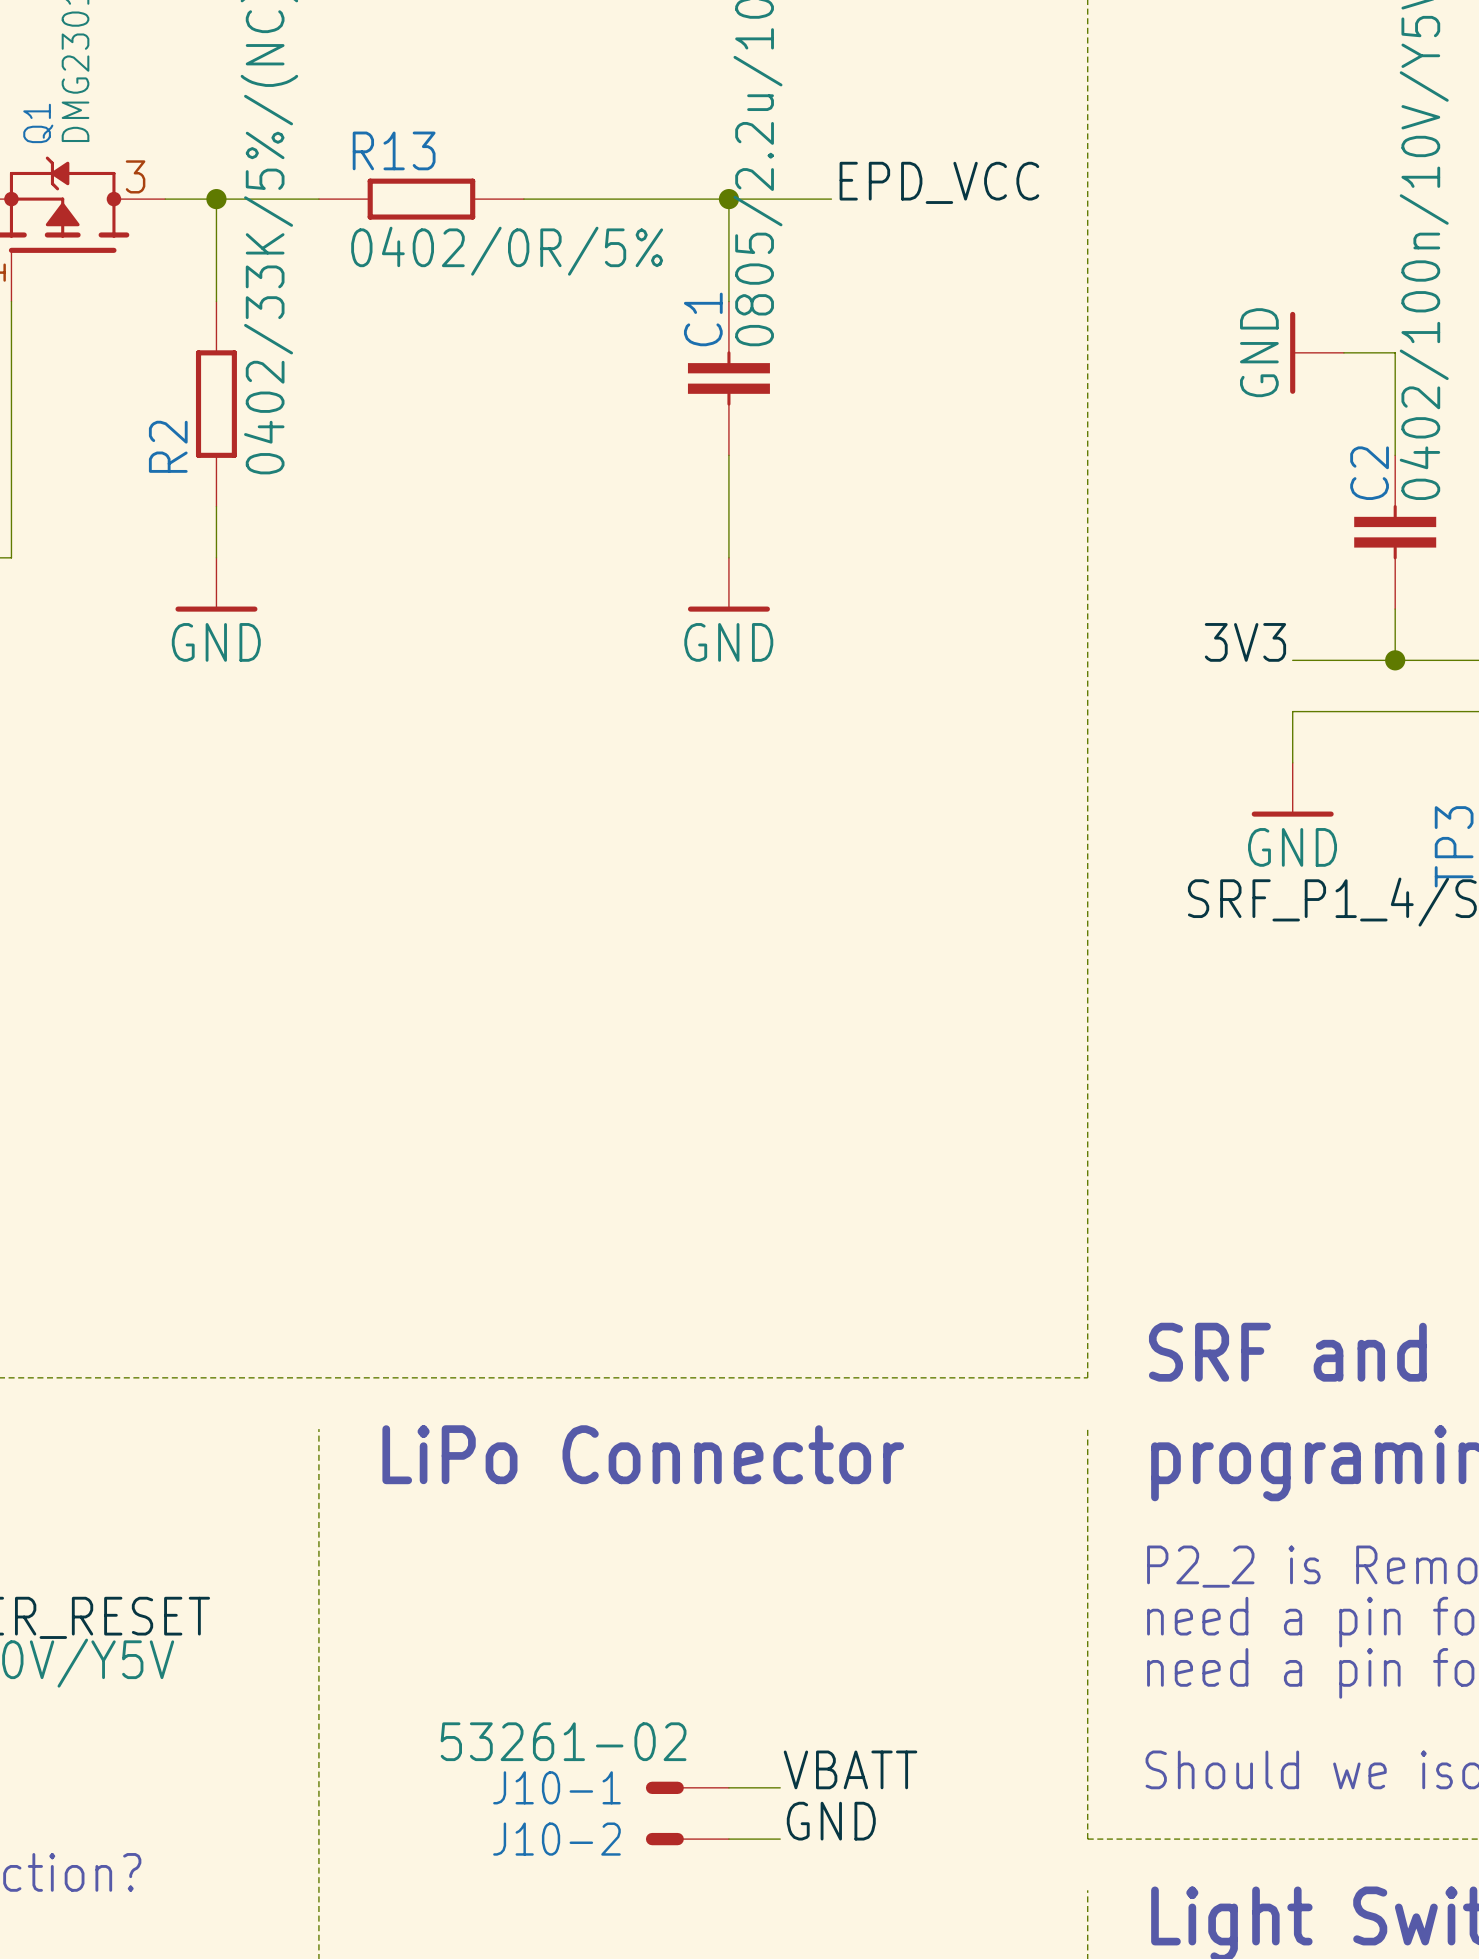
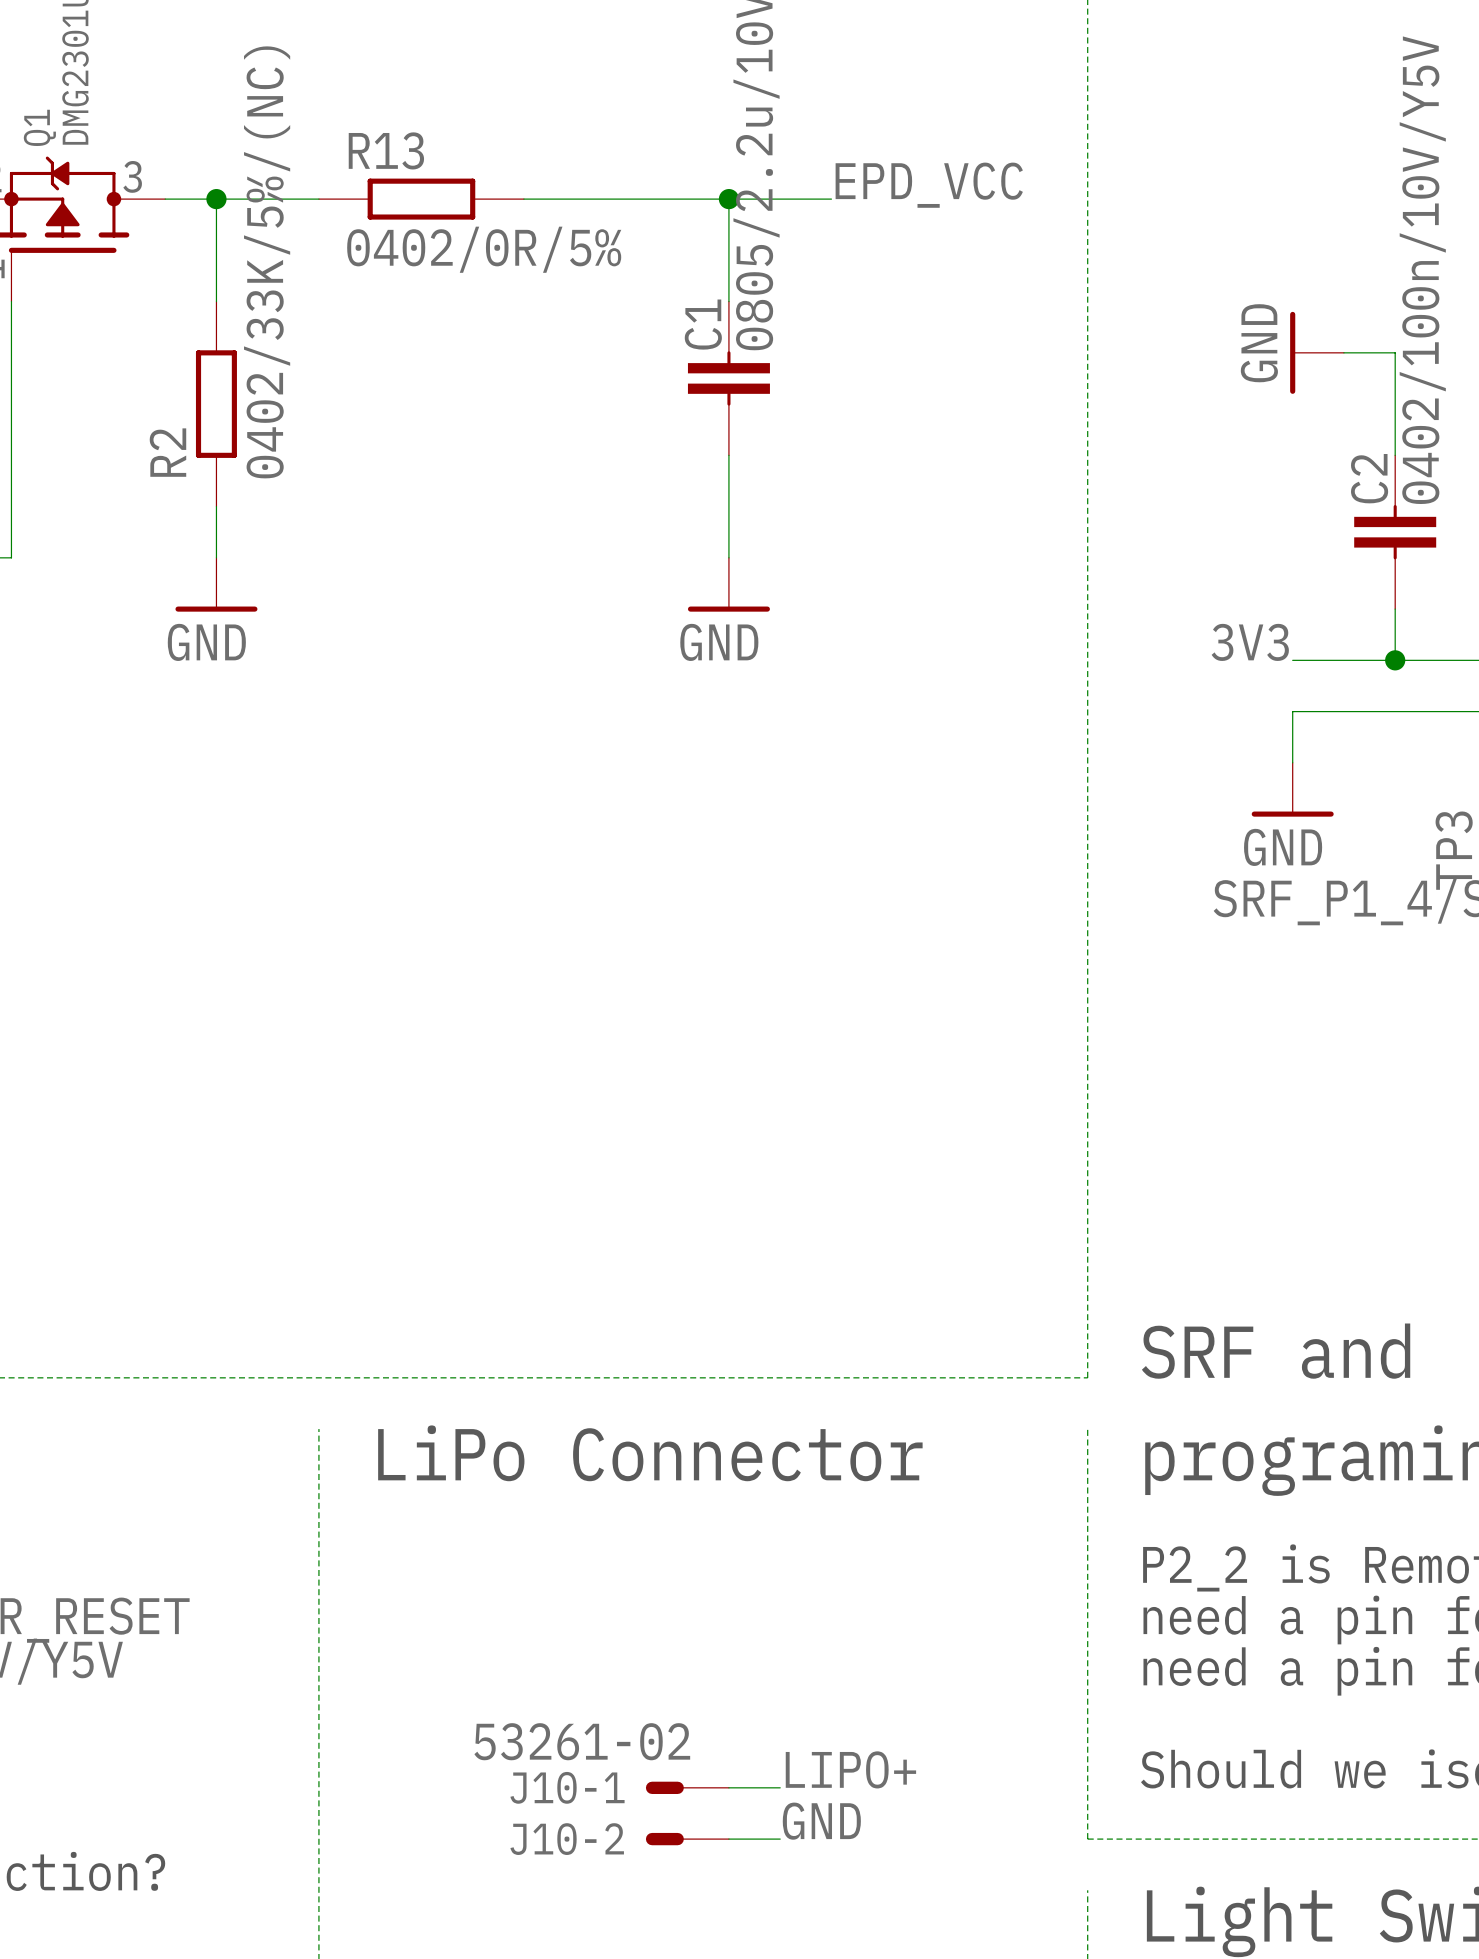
label: VBATT (850, 1769) -> LIPO+ (850, 1769)

